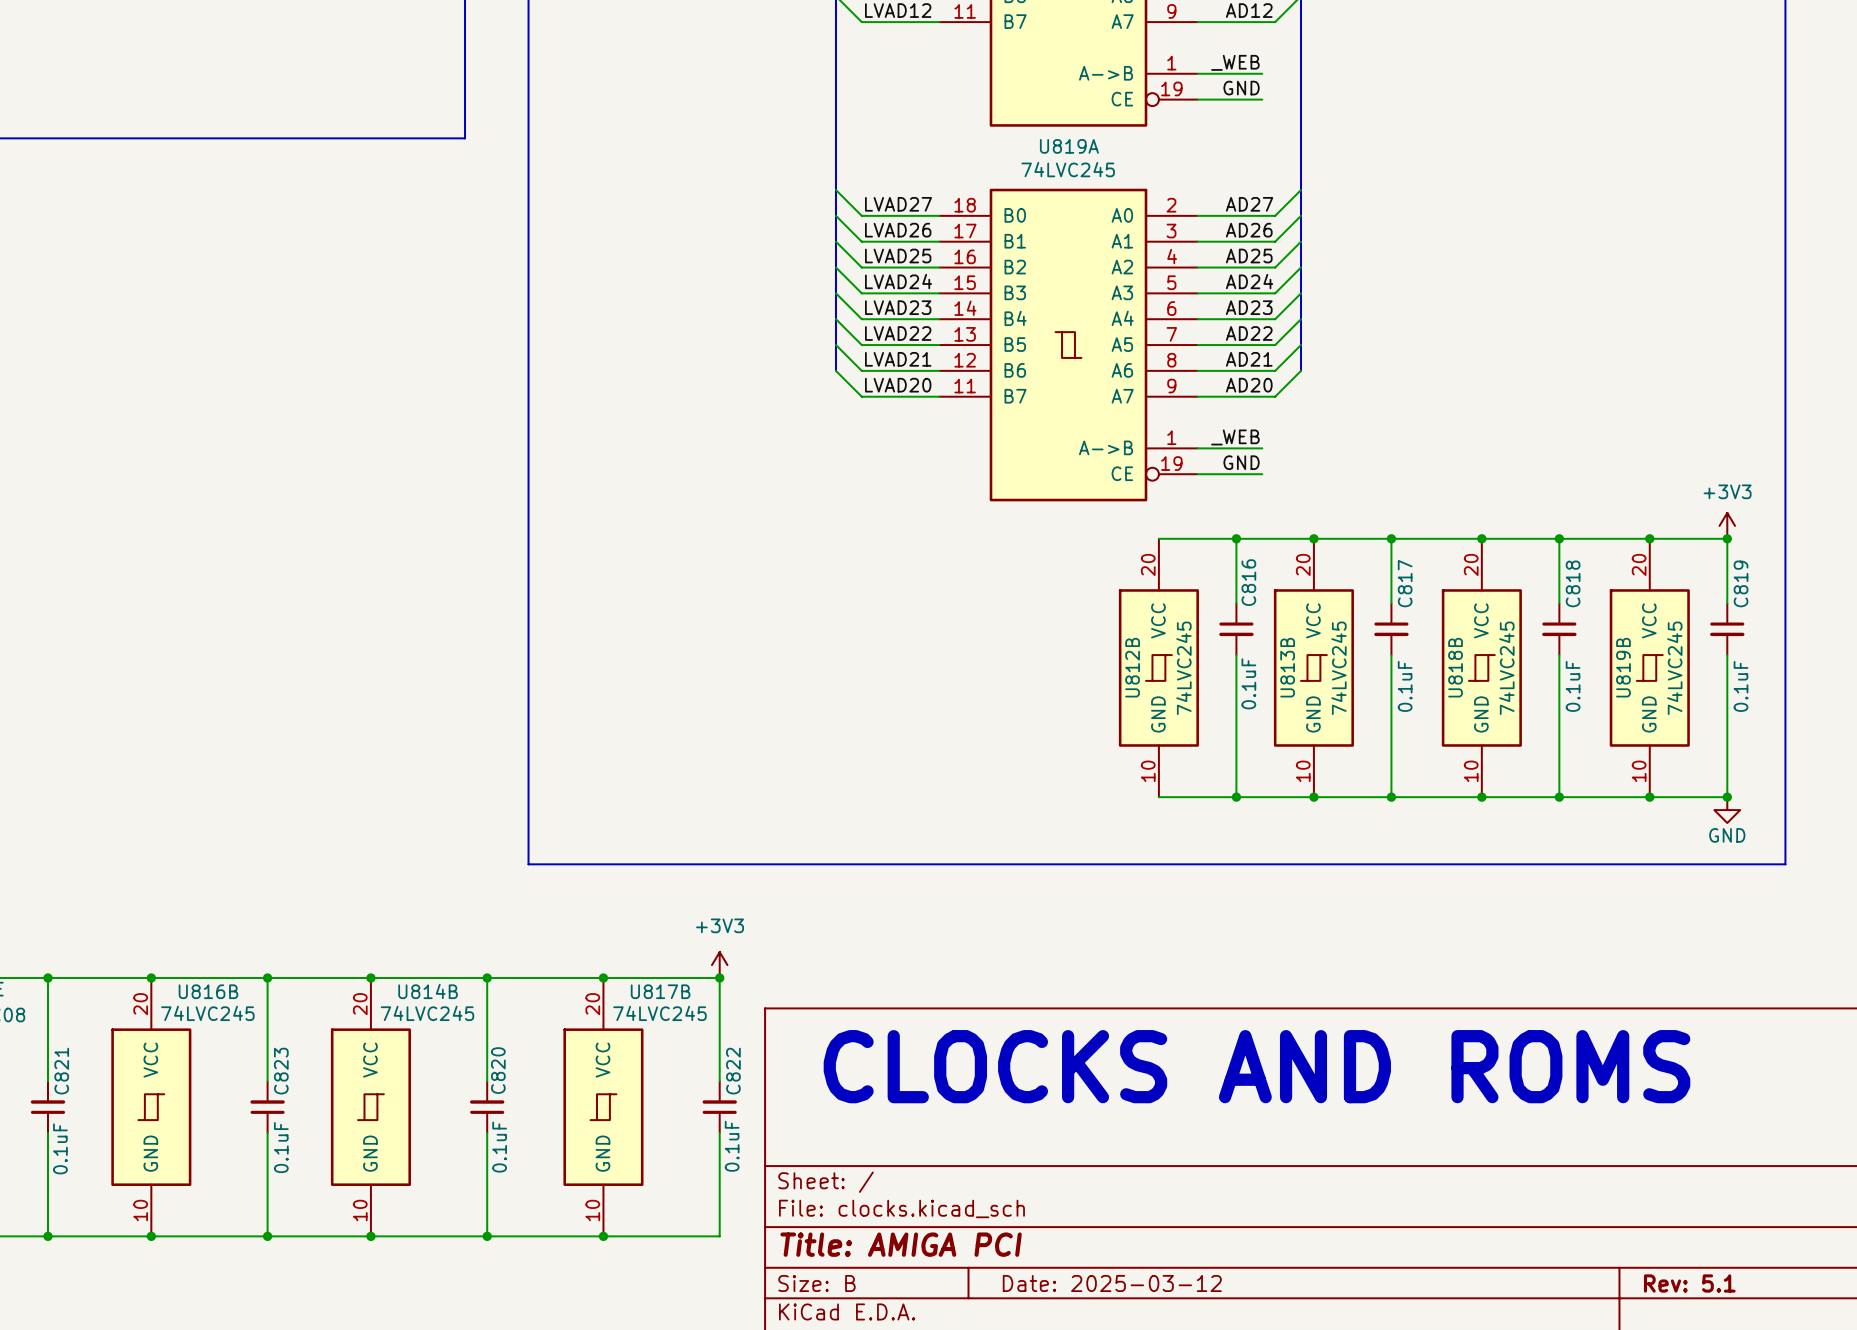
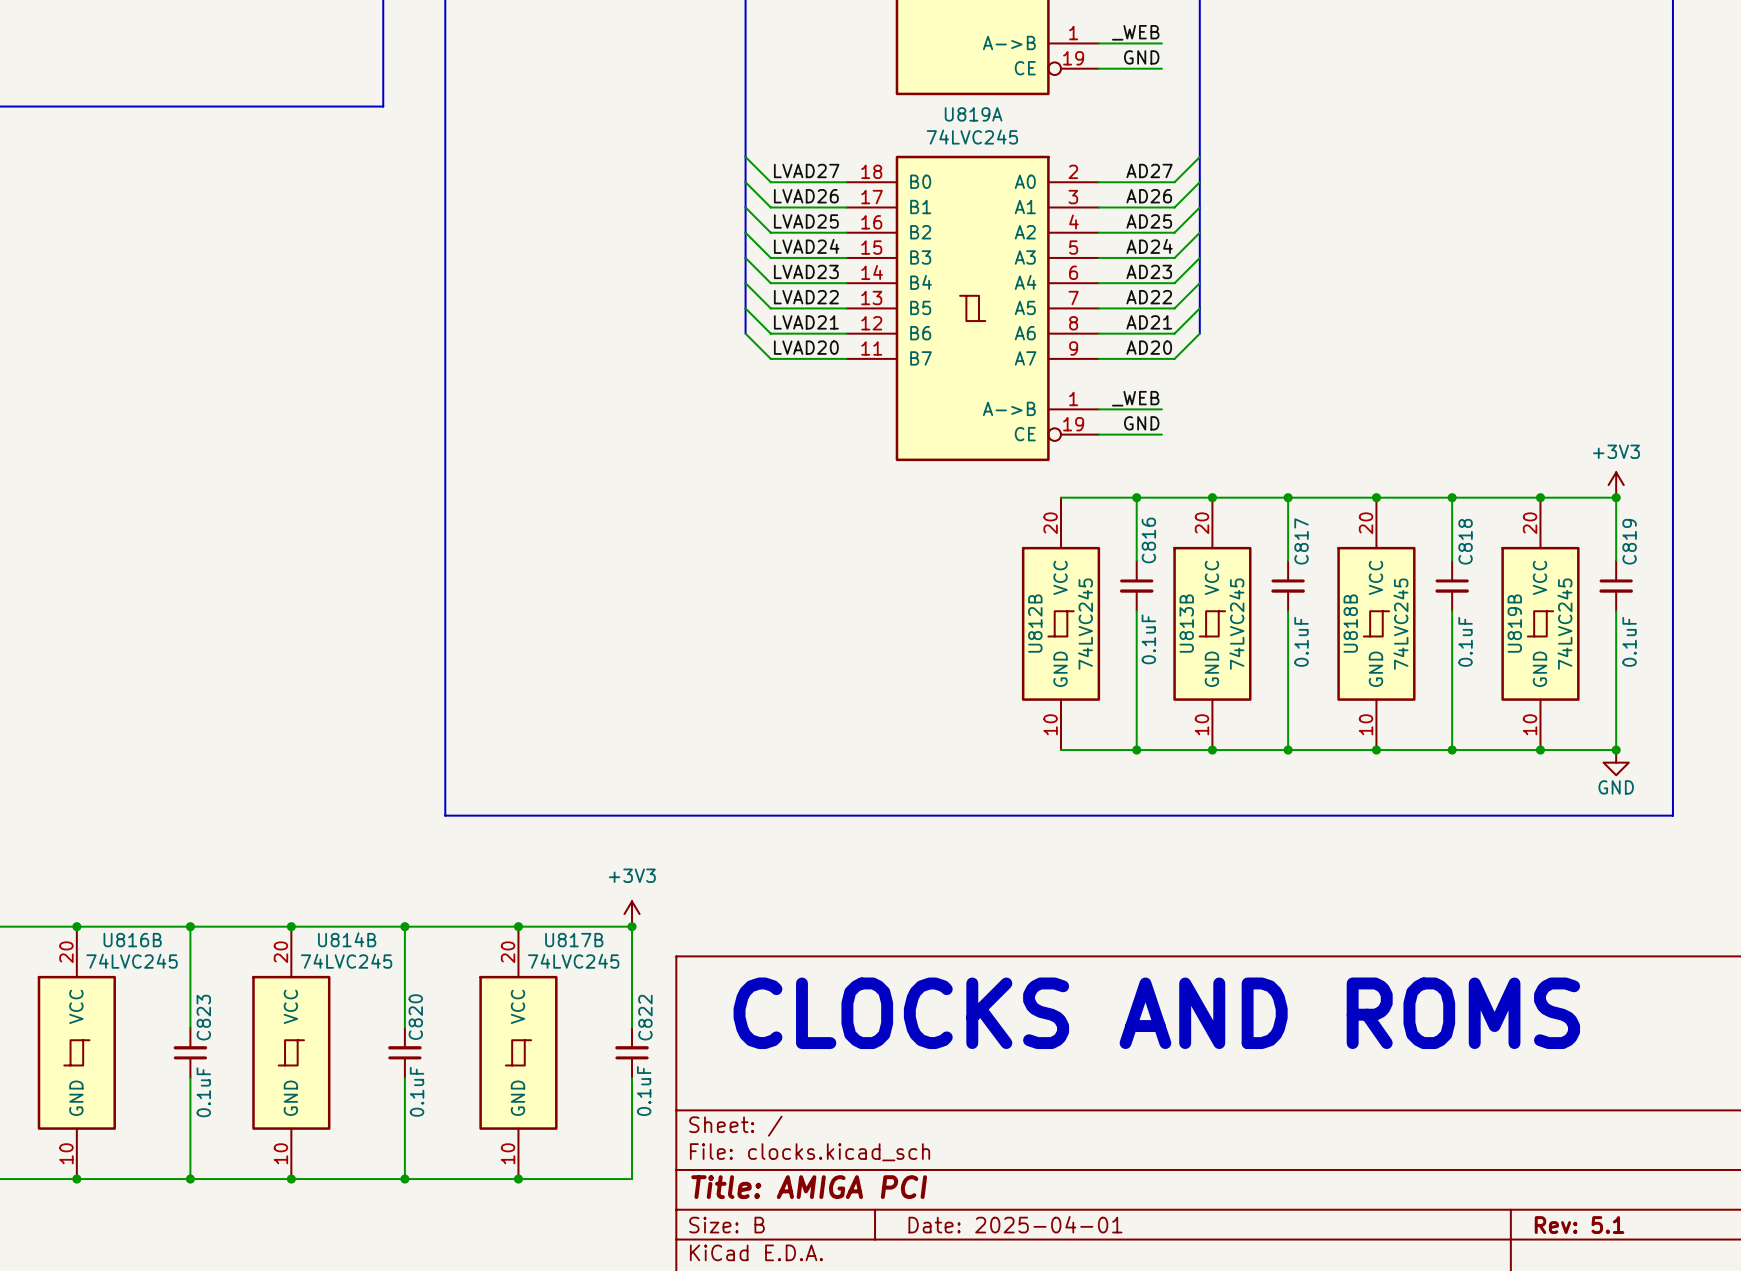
title block: Date: 2025-03-12 (1112, 1283) -> Date: 2025-04-01 (1015, 1224)

